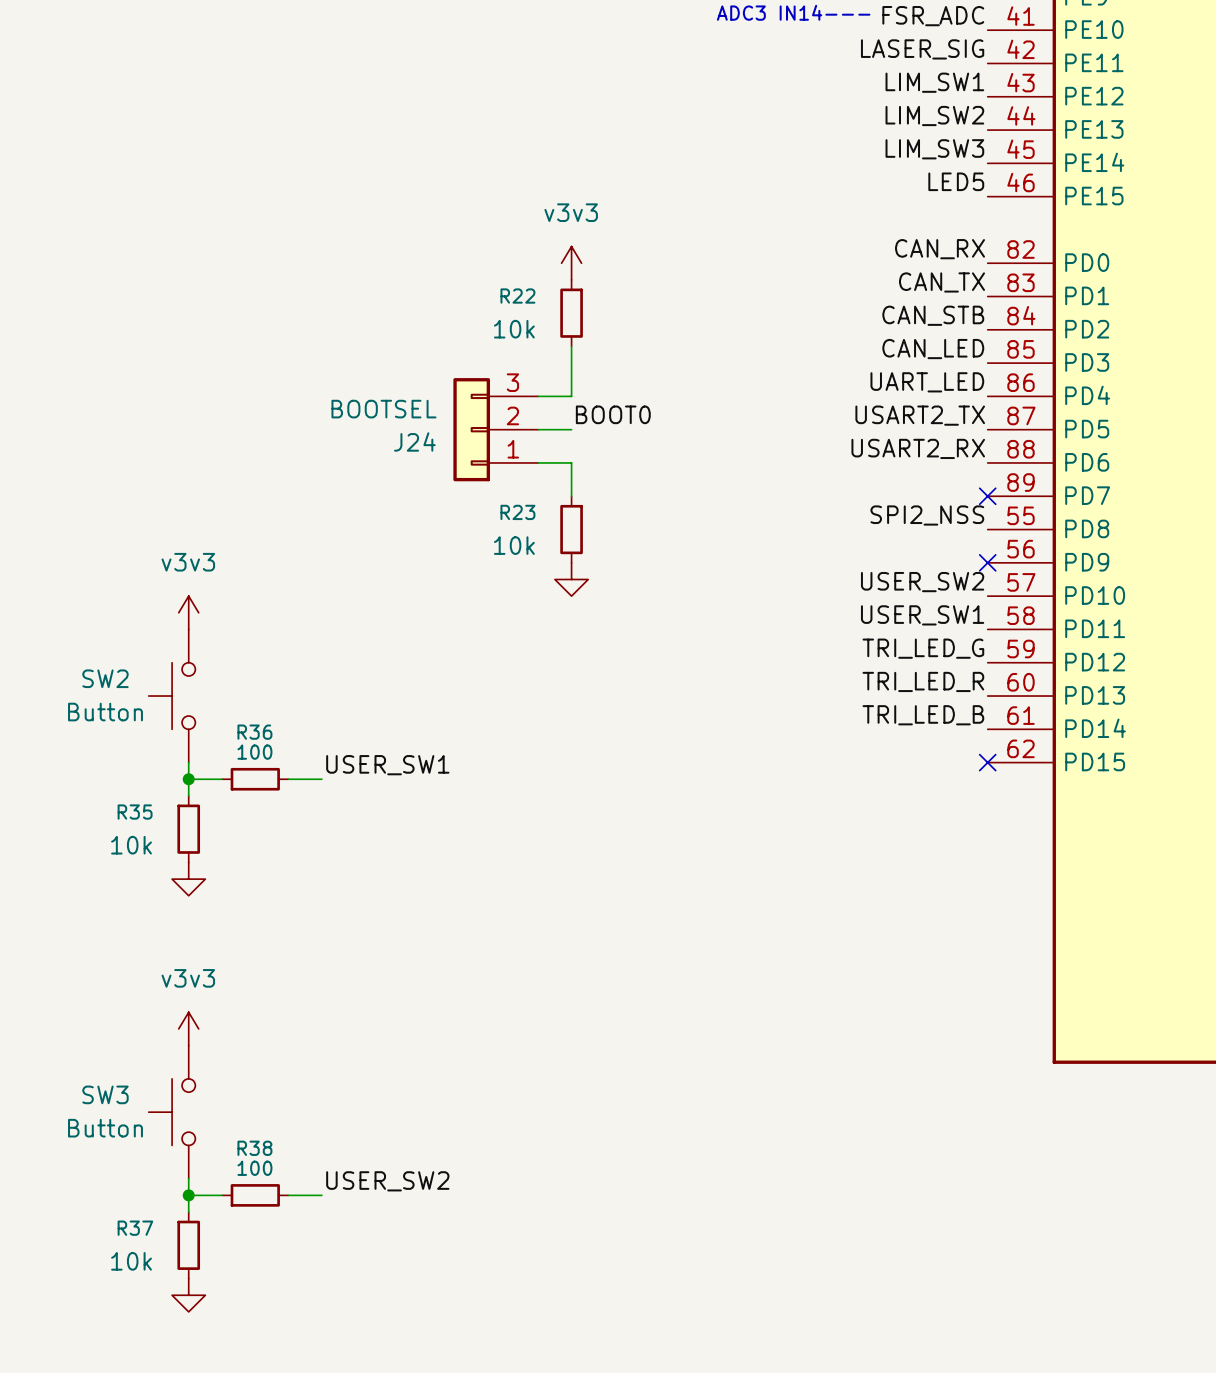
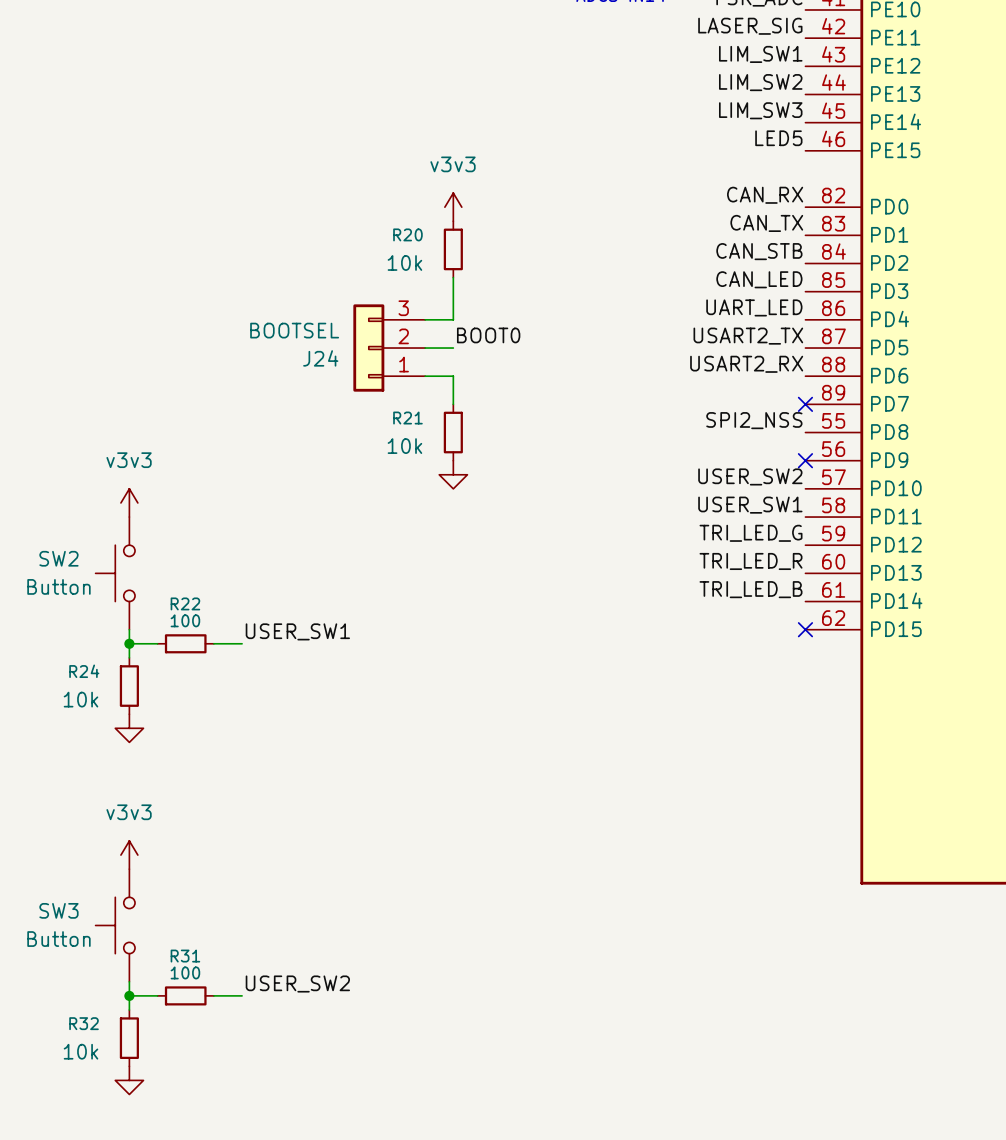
R22 name: R22 (517, 296) -> R20 (407, 234)
R23 name: R23 (517, 512) -> R21 (407, 418)
R36 name: R36 (254, 732) -> R22 (185, 603)
R35 name: R35 (135, 812) -> R24 (84, 671)
R38 name: R38 (254, 1148) -> R31 (185, 956)
R37 name: R37 (135, 1228) -> R32 (84, 1023)

